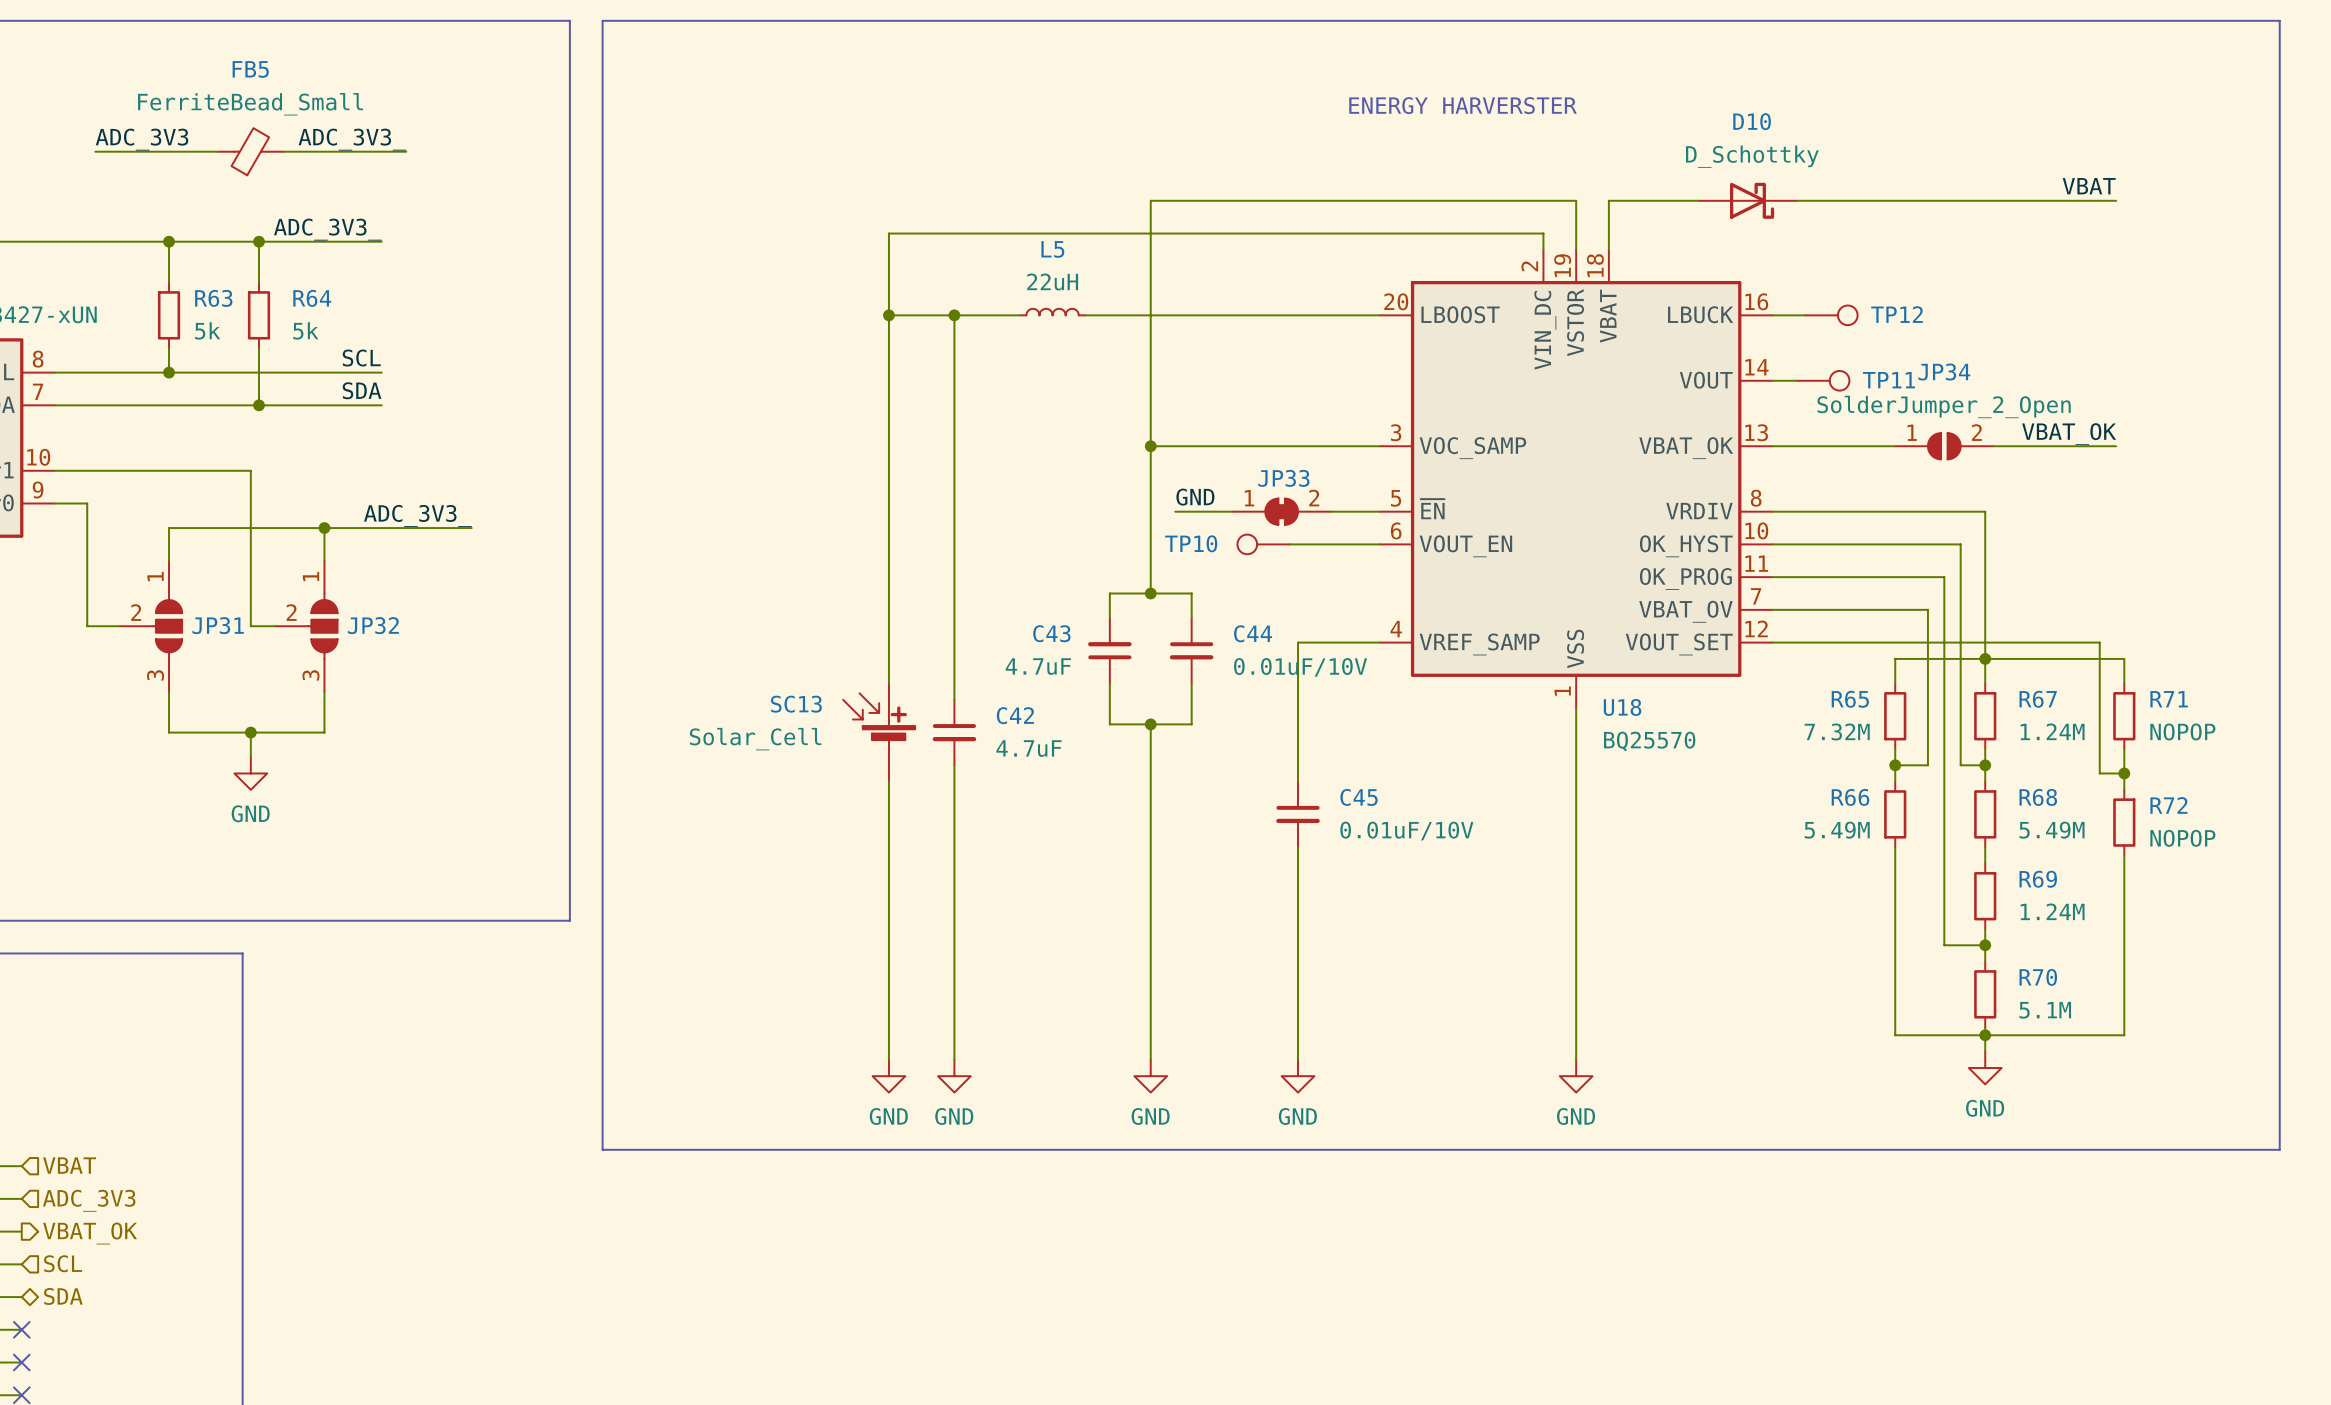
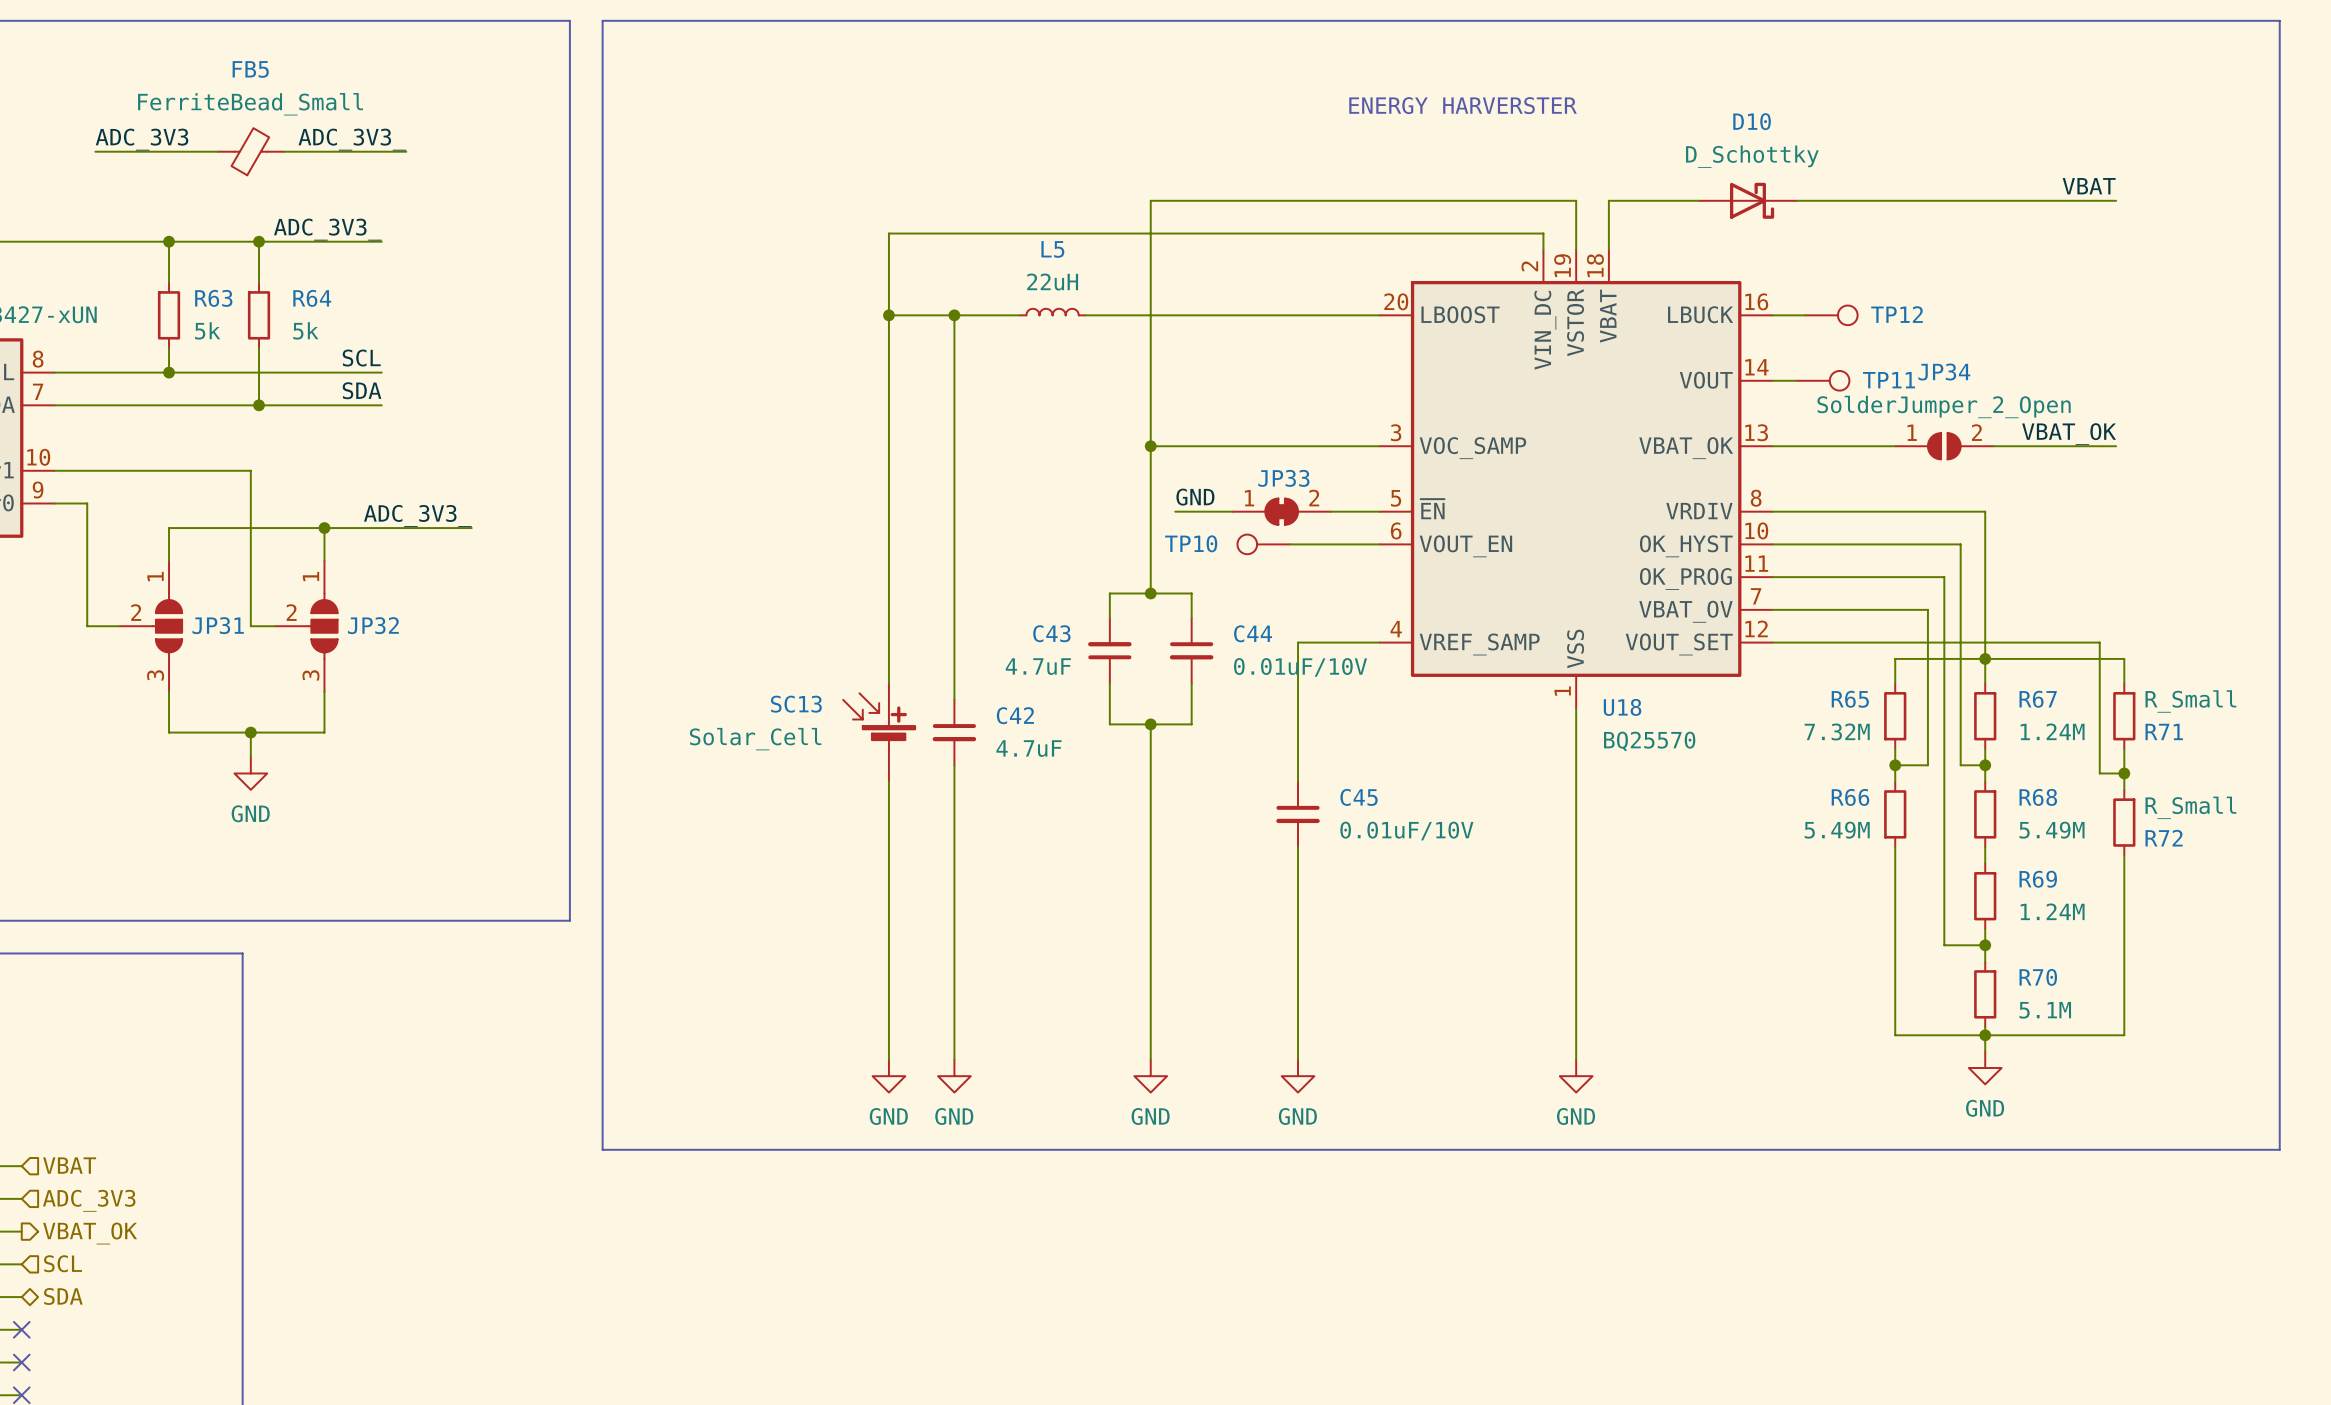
R71 name position: R71 (2169, 699) -> R71 (2164, 731)
R71 value: NOPOP (2182, 731) -> R_Small (2190, 701)
R72 name position: R72 (2168, 805) -> R72 (2164, 838)
R72 value: NOPOP (2182, 838) -> R_Small (2190, 807)

